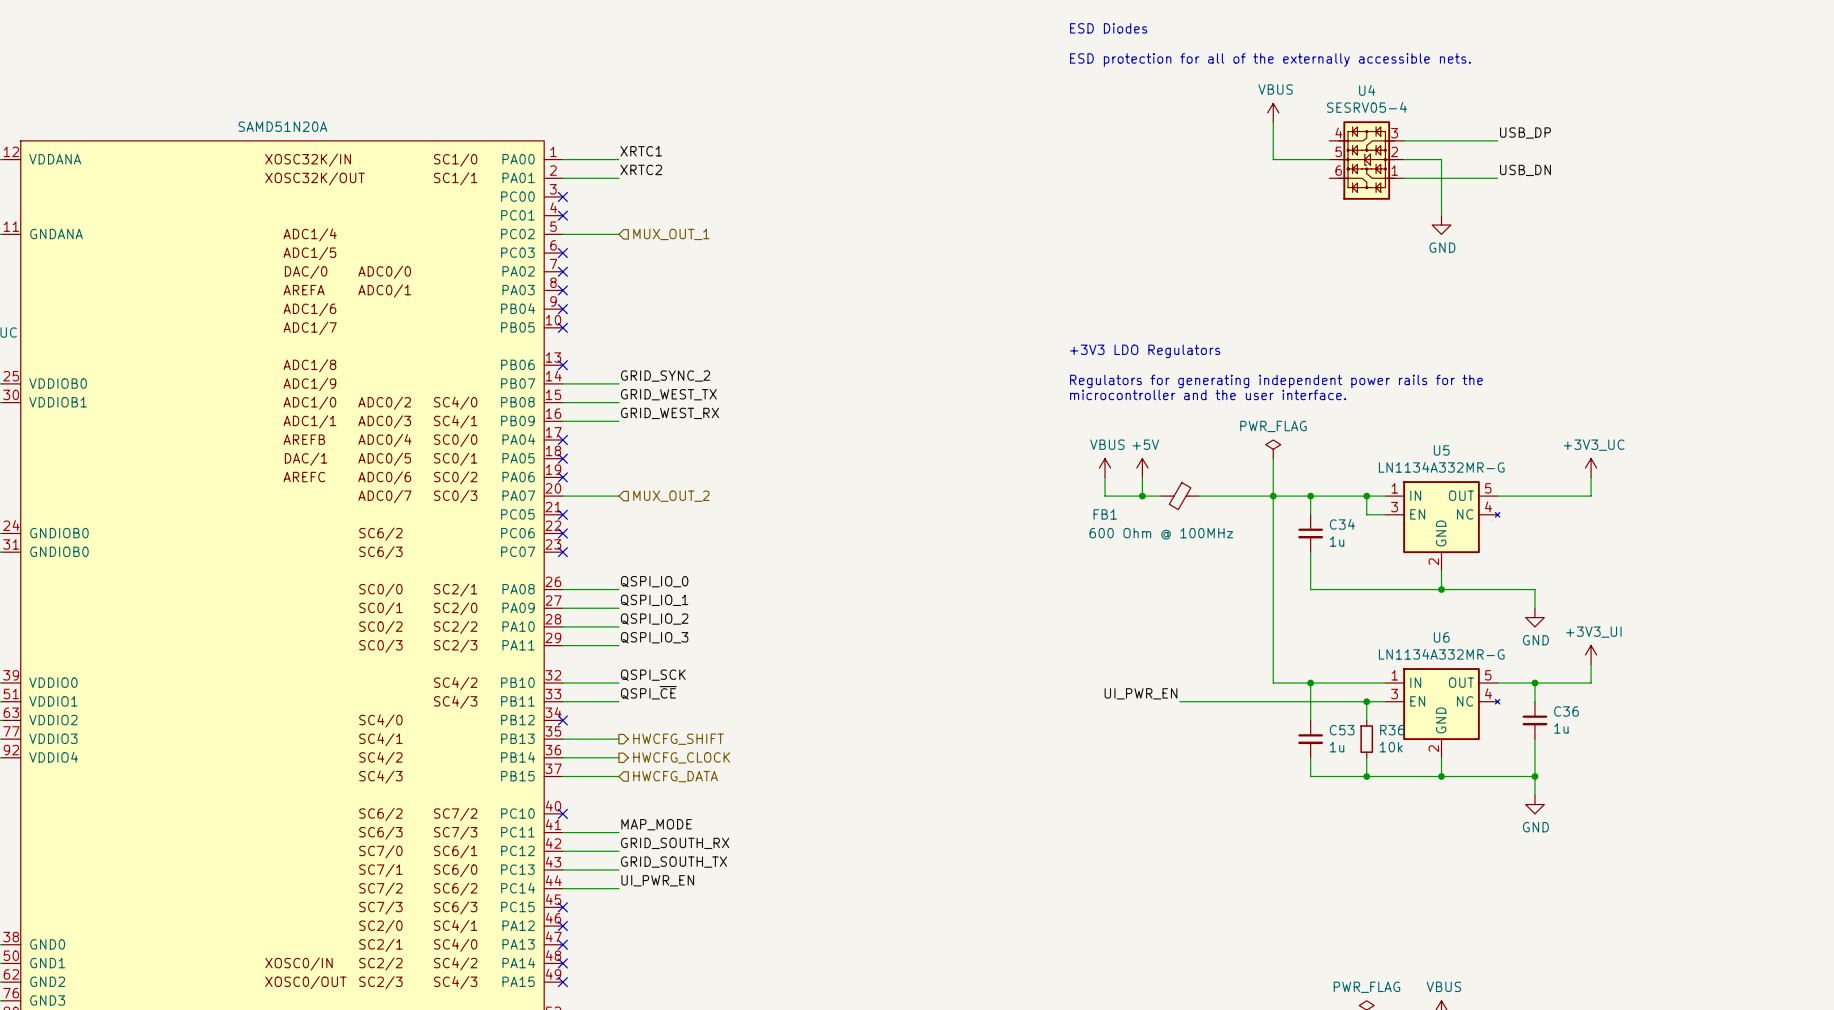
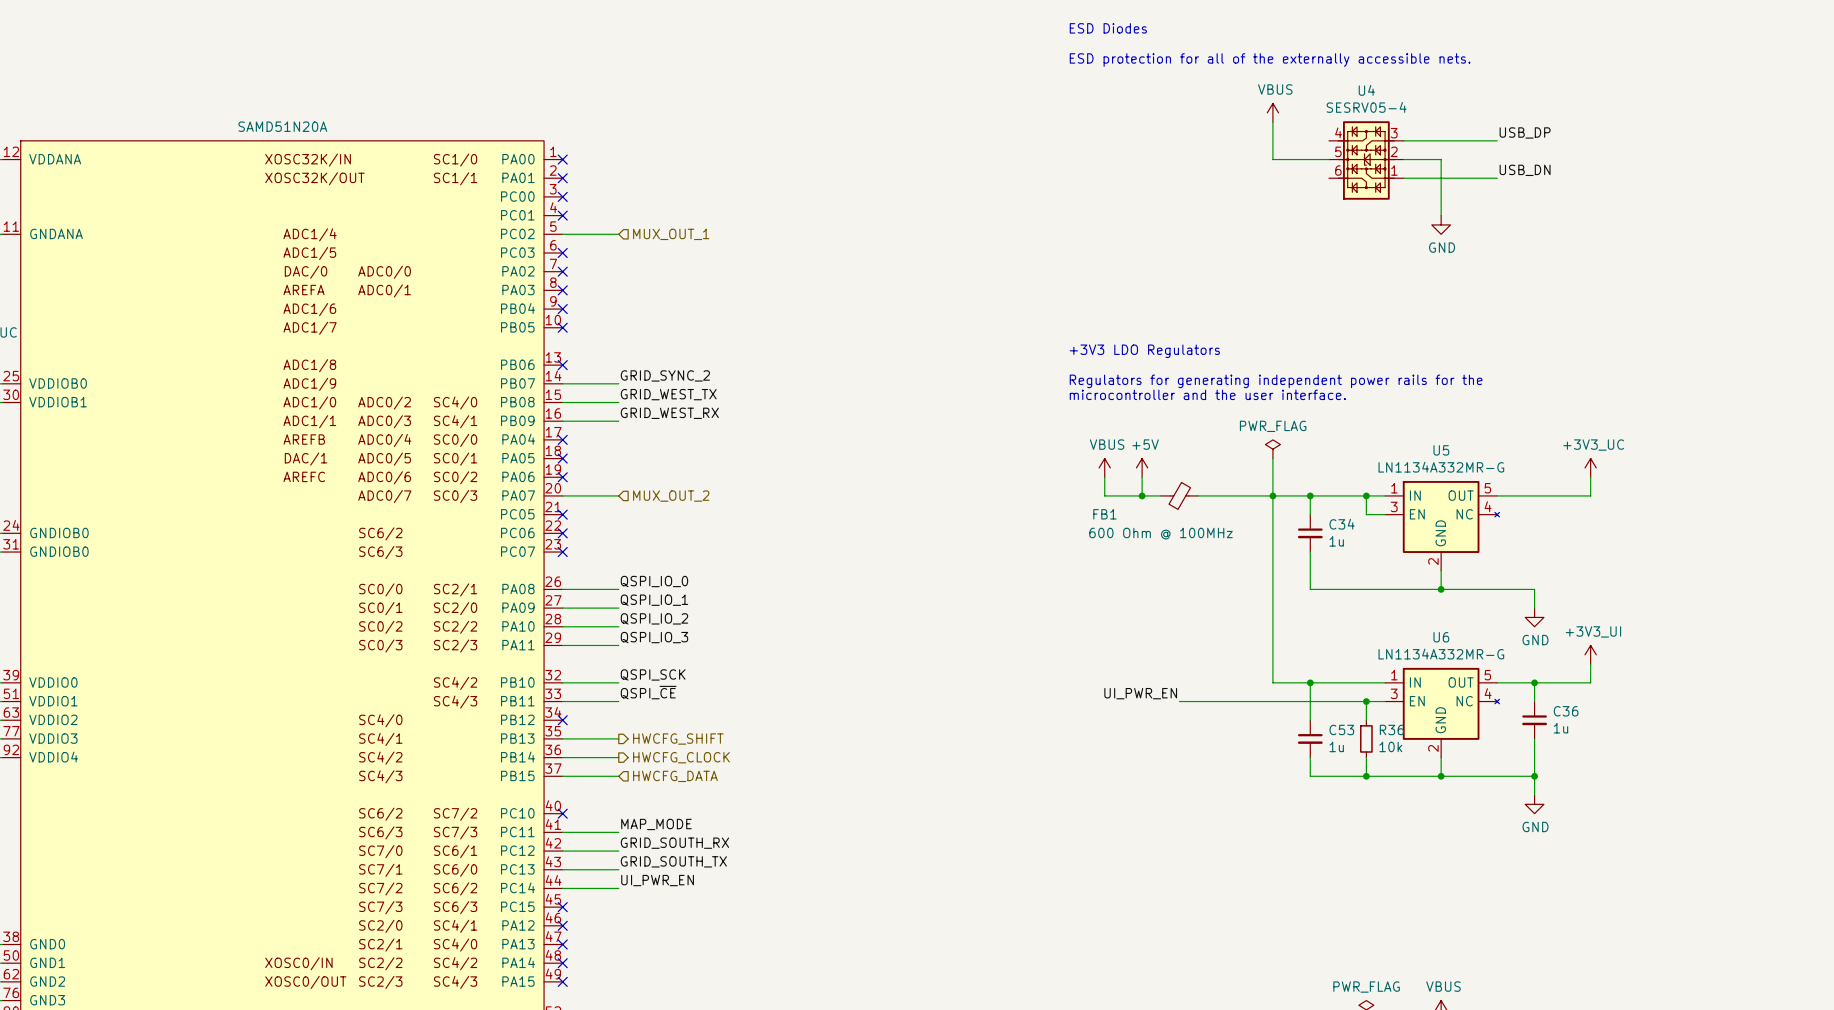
label: XRTC1 (641, 151) -> none
wire: (562, 159) (618, 159) -> none
no-connect mark: none -> (562, 159)
label: XRTC2 (641, 169) -> none
wire: (562, 178) (618, 178) -> none
no-connect mark: none -> (562, 178)

